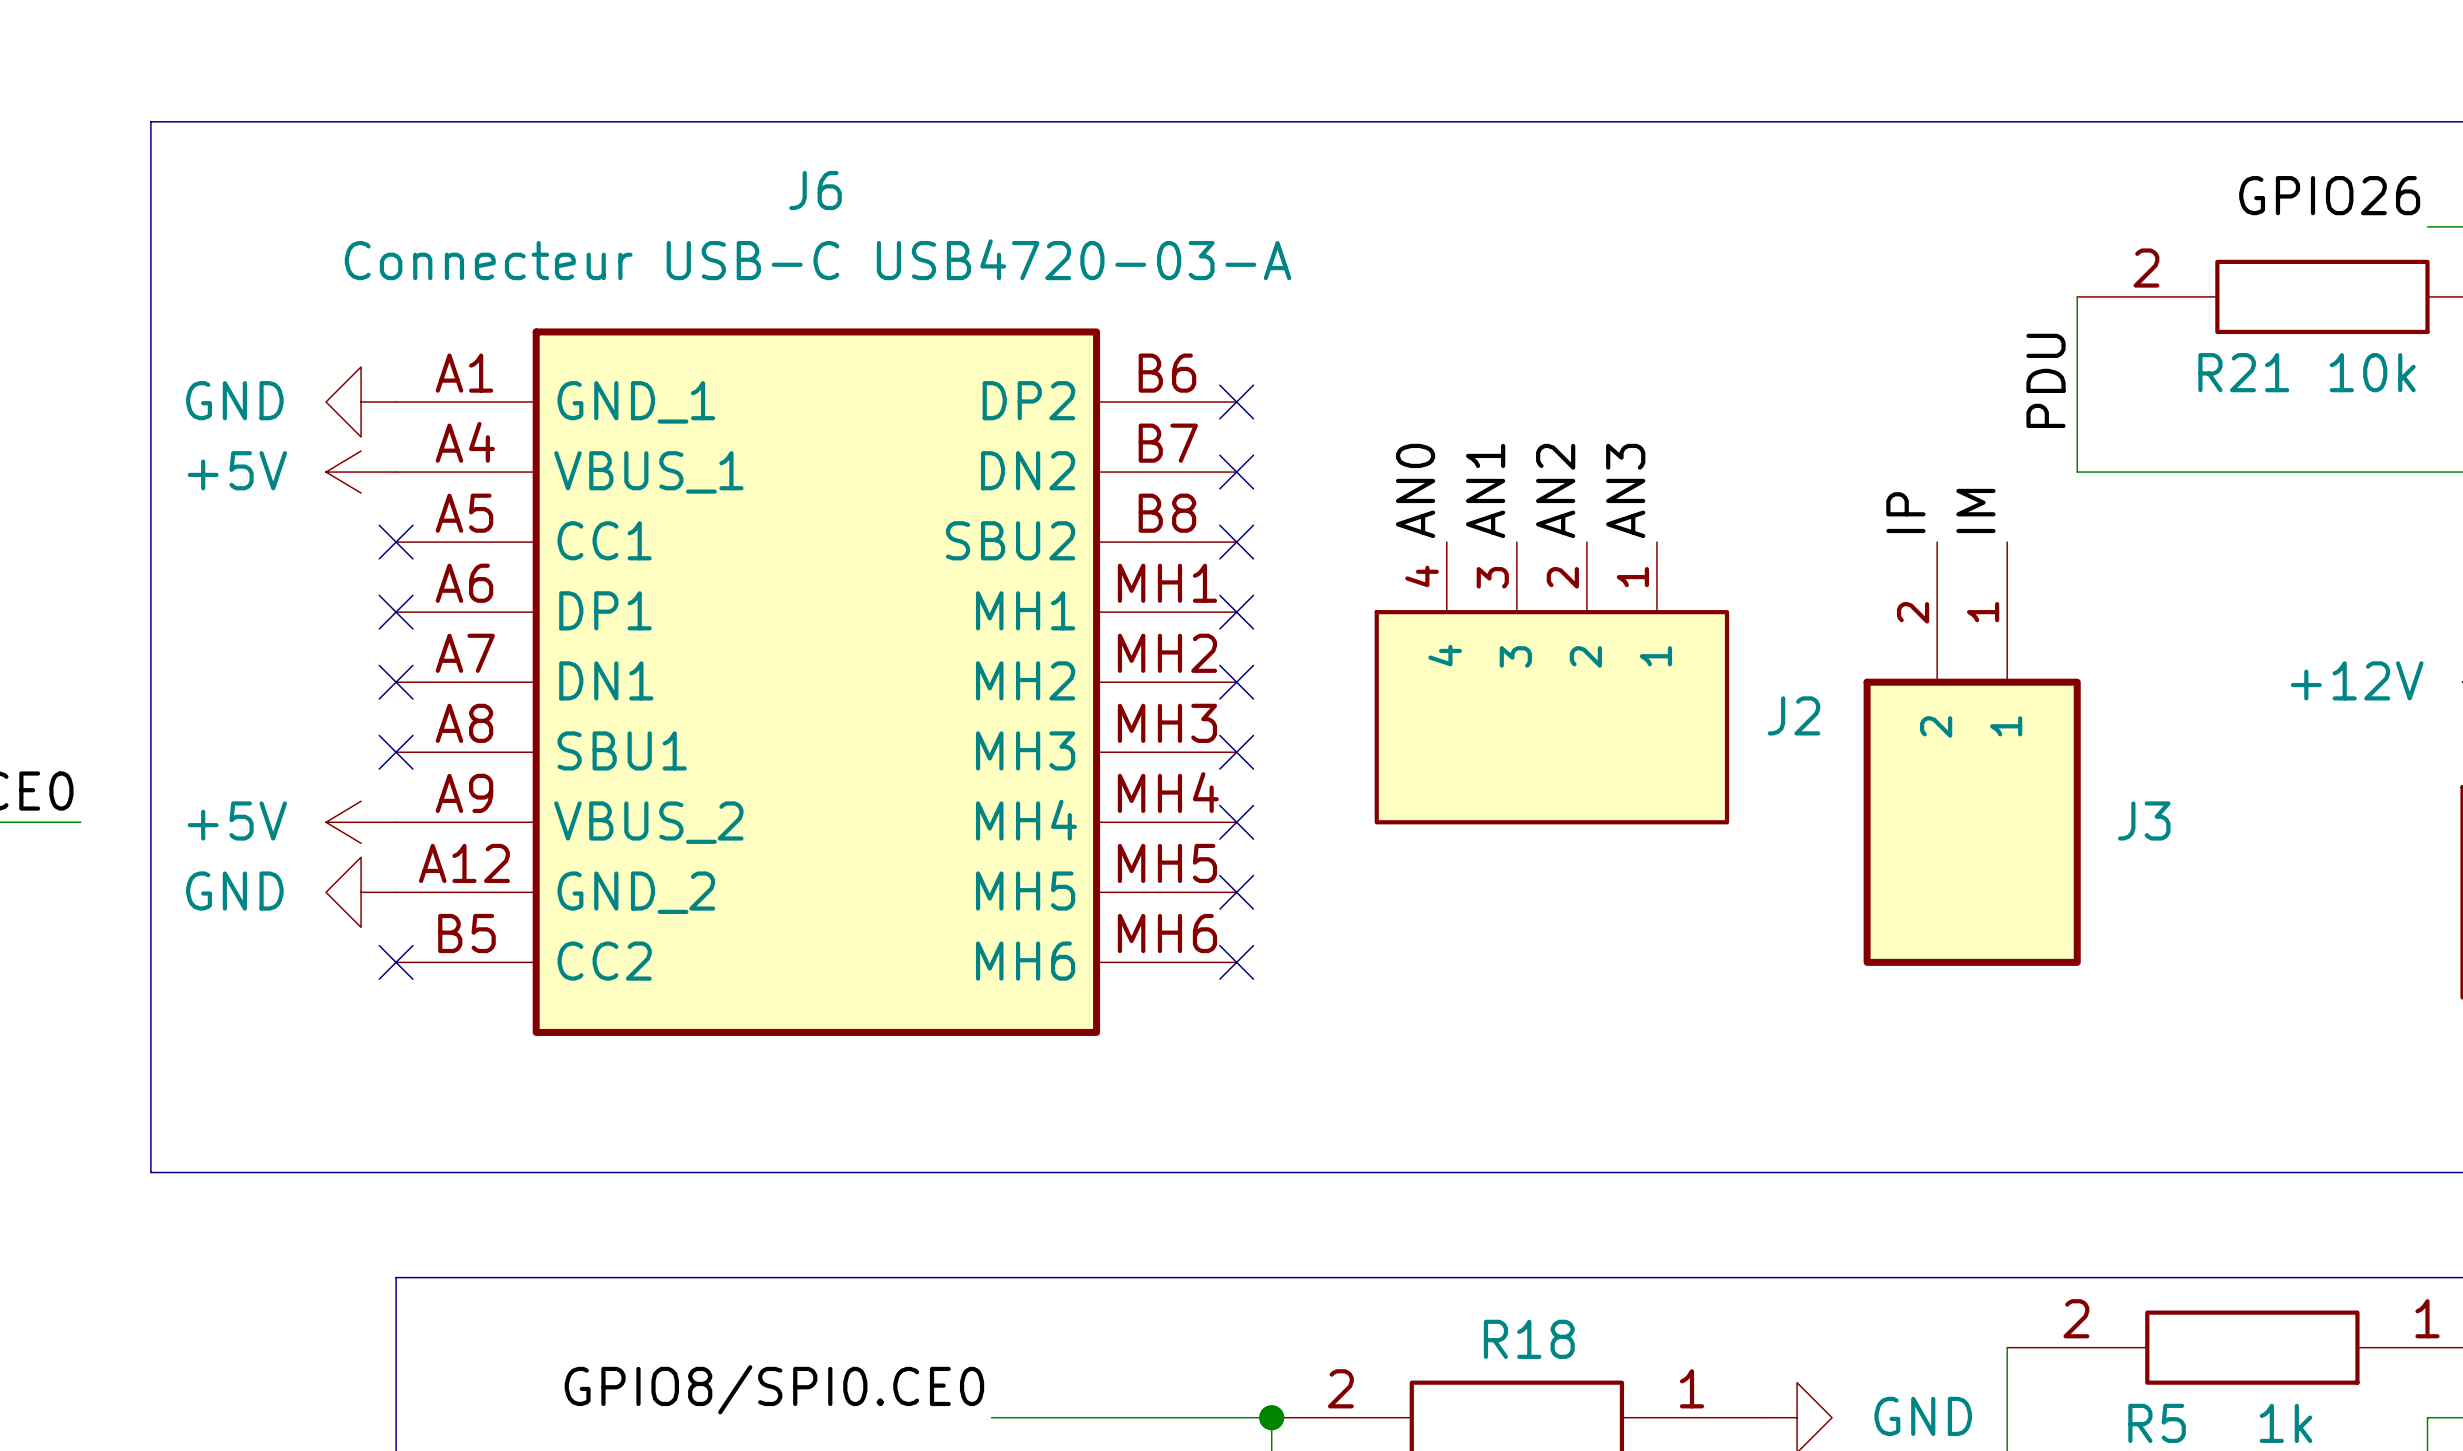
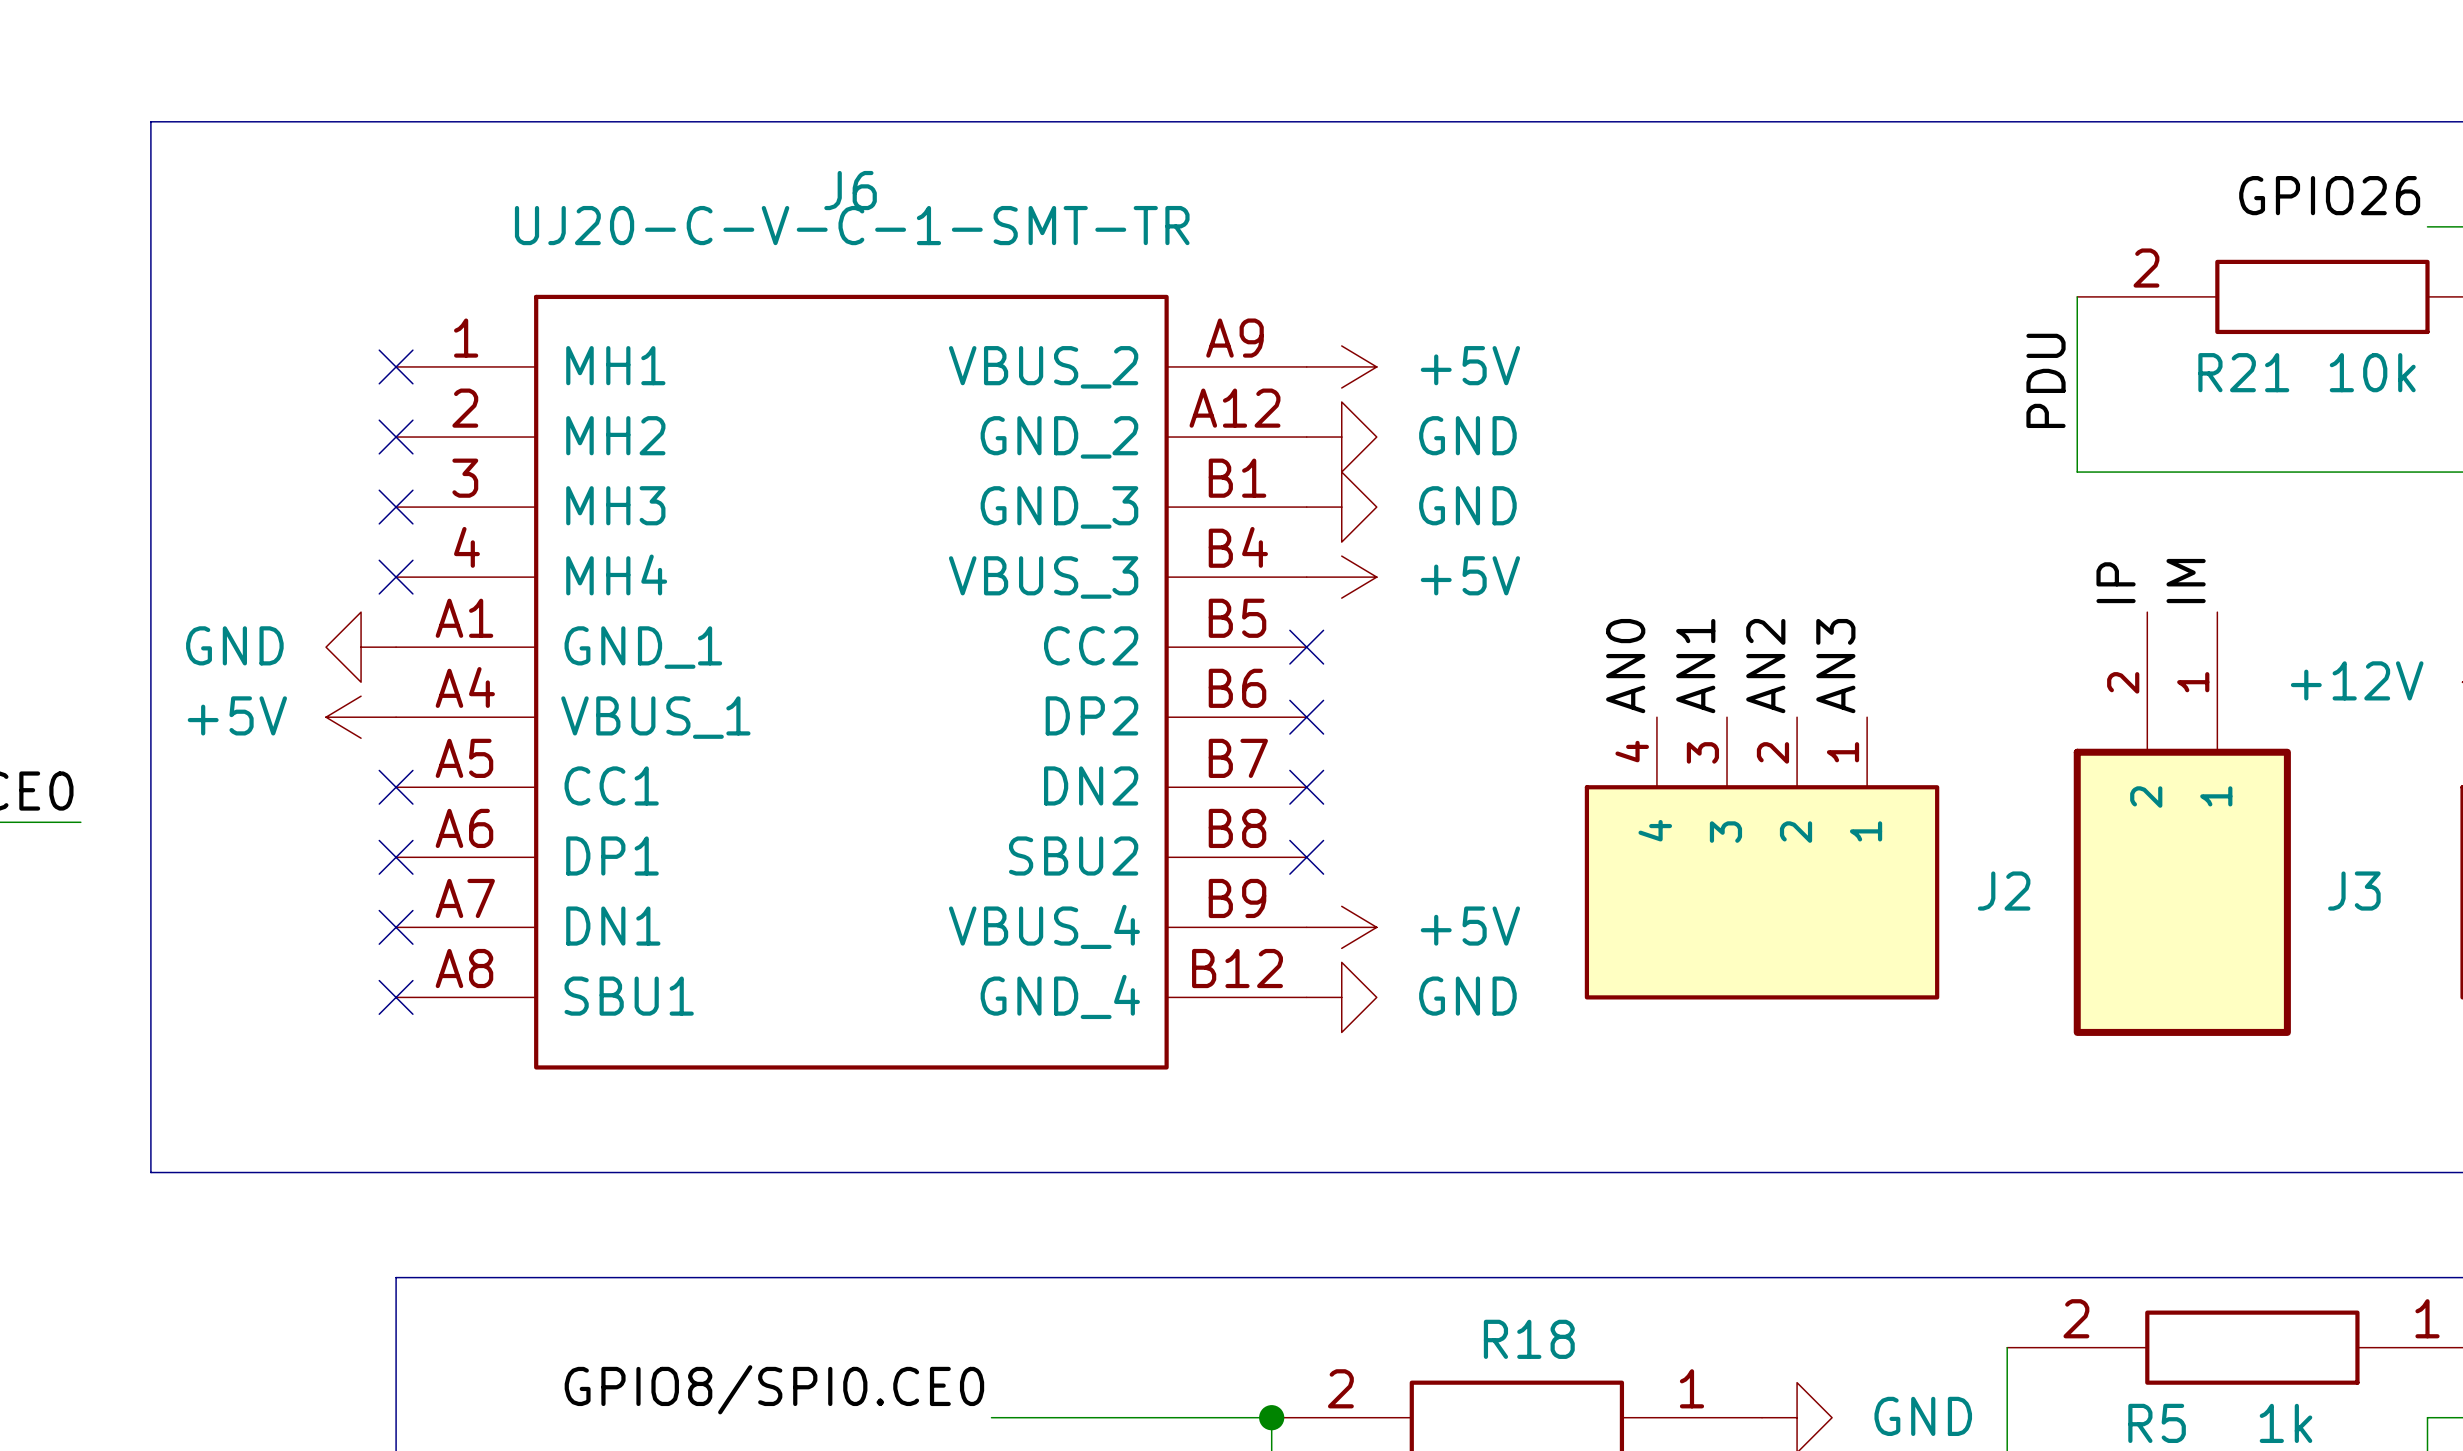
J6 value: Connecteur USB-C USB4720-03-A (818, 259) -> UJ20-C-V-C-1-SMT-TR (852, 225)
J6 symbol: [396, 328, 1237, 1036] -> [396, 294, 1307, 1070]
no-connect mark: none -> (396, 366)
power symbol: none -> +5V (1341, 366)
power symbol: GND (361, 401) -> none
no-connect mark: (1236, 401) -> none
no-connect mark: none -> (396, 437)
power symbol: none -> GND (1341, 437)
power symbol: +5V (361, 472) -> none
no-connect mark: (1236, 472) -> none
label position: AN0 (1415, 490) -> AN0 (1625, 666)
label position: AN1 (1485, 490) -> AN1 (1695, 666)
label position: AN2 (1555, 490) -> AN2 (1765, 666)
label position: AN3 (1625, 490) -> AN3 (1835, 666)
no-connect mark: none -> (396, 507)
power symbol: none -> GND (1341, 507)
label position: IM (1975, 510) -> IM (2186, 581)
label position: IP (1905, 512) -> IP (2116, 582)
no-connect mark: (396, 542) -> none
no-connect mark: (1236, 542) -> none
no-connect mark: none -> (396, 577)
power symbol: none -> +5V (1341, 577)
no-connect mark: (396, 612) -> none
no-connect mark: (1236, 612) -> none
power symbol: none -> GND (361, 647)
no-connect mark: none -> (1306, 647)
no-connect mark: (396, 682) -> none
no-connect mark: (1236, 682) -> none
J2 position: (1551, 683) -> (1762, 858)
no-connect mark: none -> (1306, 717)
no-connect mark position: (396, 752) -> (396, 787)
no-connect mark: (1236, 752) -> none
J3 position: (1972, 753) -> (2182, 824)
no-connect mark: none -> (1306, 787)
power symbol position: +5V (361, 822) -> +5V (361, 717)
no-connect mark: (1236, 822) -> none
no-connect mark: none -> (396, 857)
no-connect mark: none -> (1306, 857)
power symbol: GND (361, 892) -> none
no-connect mark: (1236, 892) -> none
no-connect mark: none -> (396, 927)
power symbol: none -> +5V (1341, 927)
no-connect mark: (396, 962) -> none
no-connect mark: (1236, 962) -> none
no-connect mark: none -> (396, 997)
power symbol: none -> GND (1341, 997)

